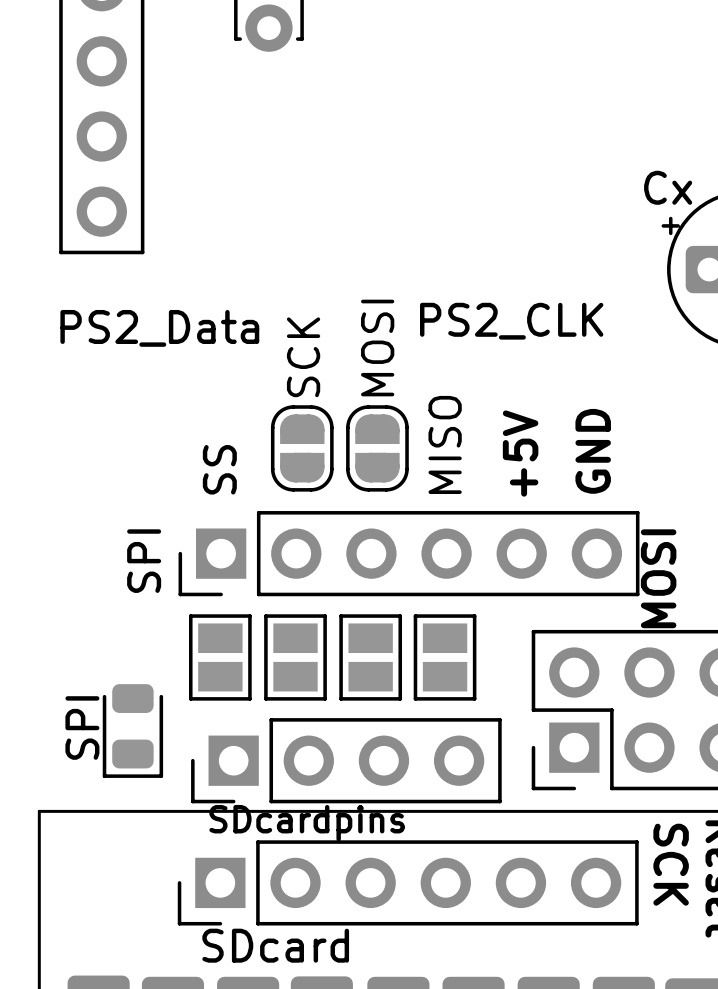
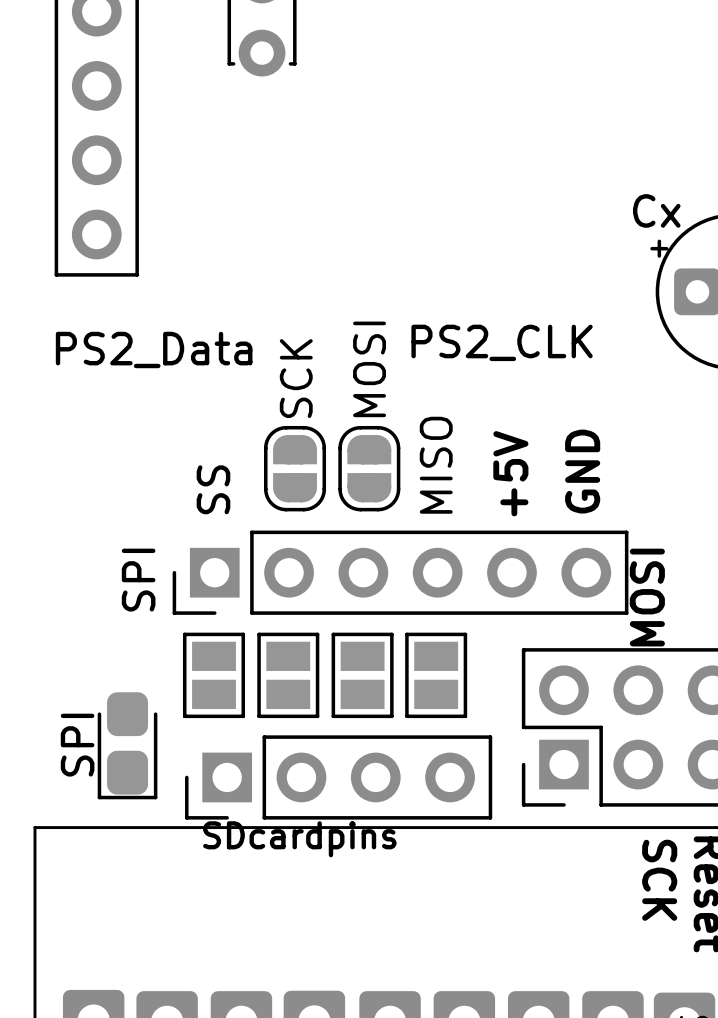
part footprint: [102, 684, 164, 778] -> [97, 692, 158, 800]
part: SDcard (408, 882) -> none

